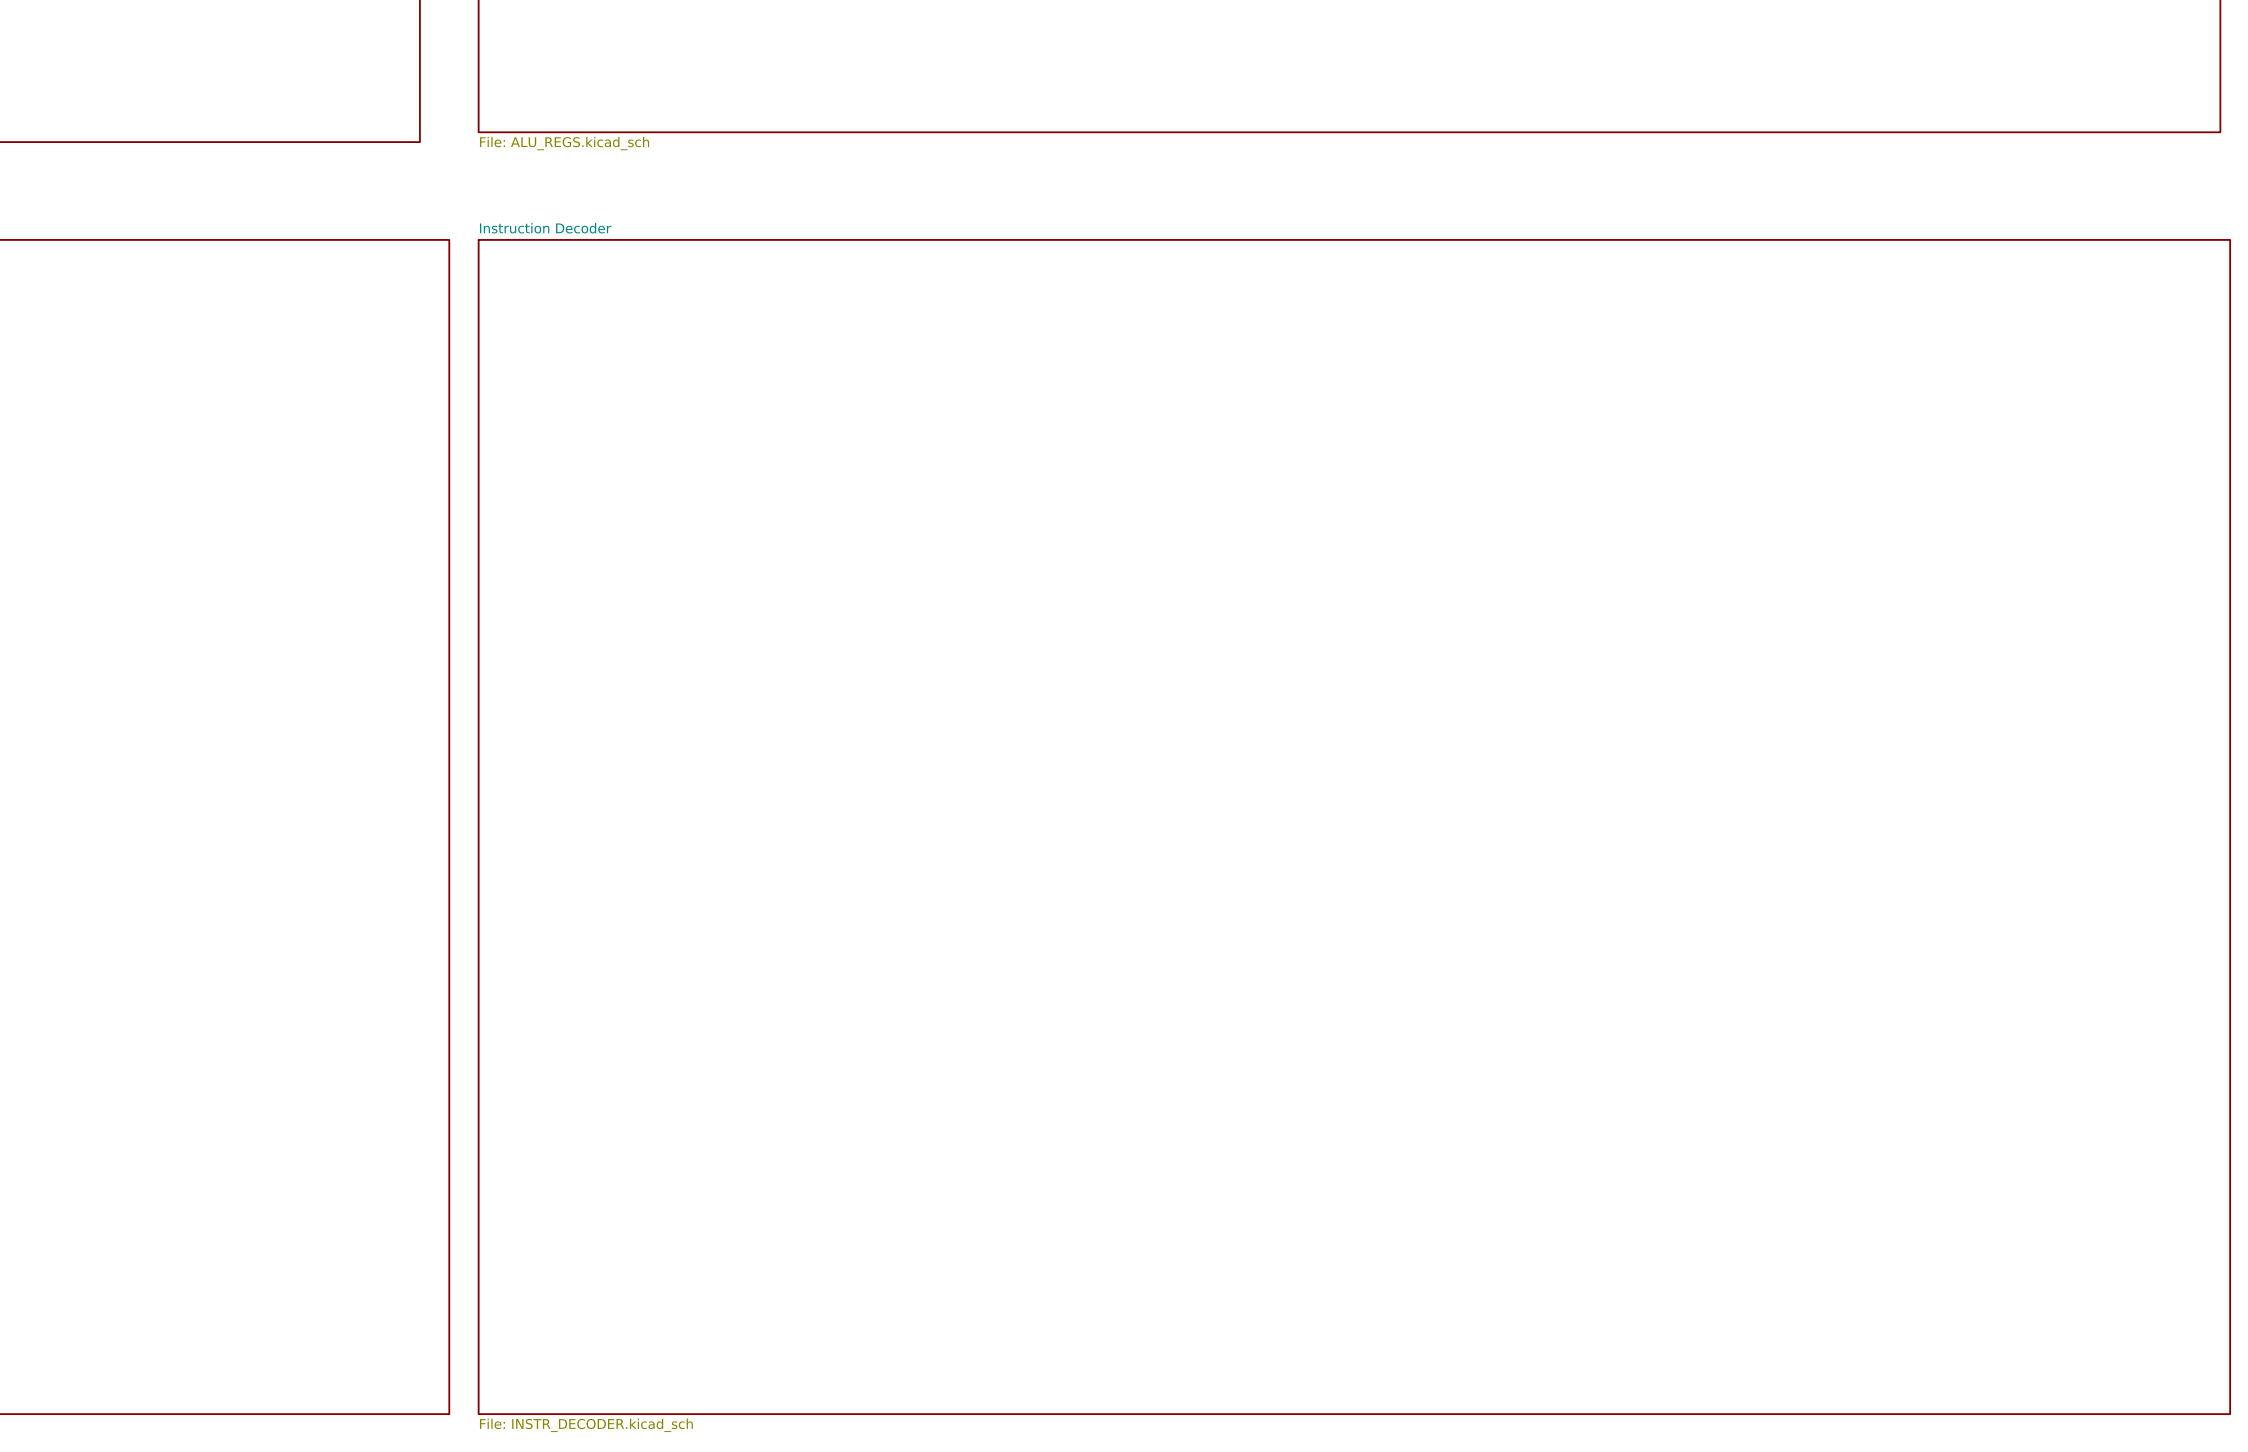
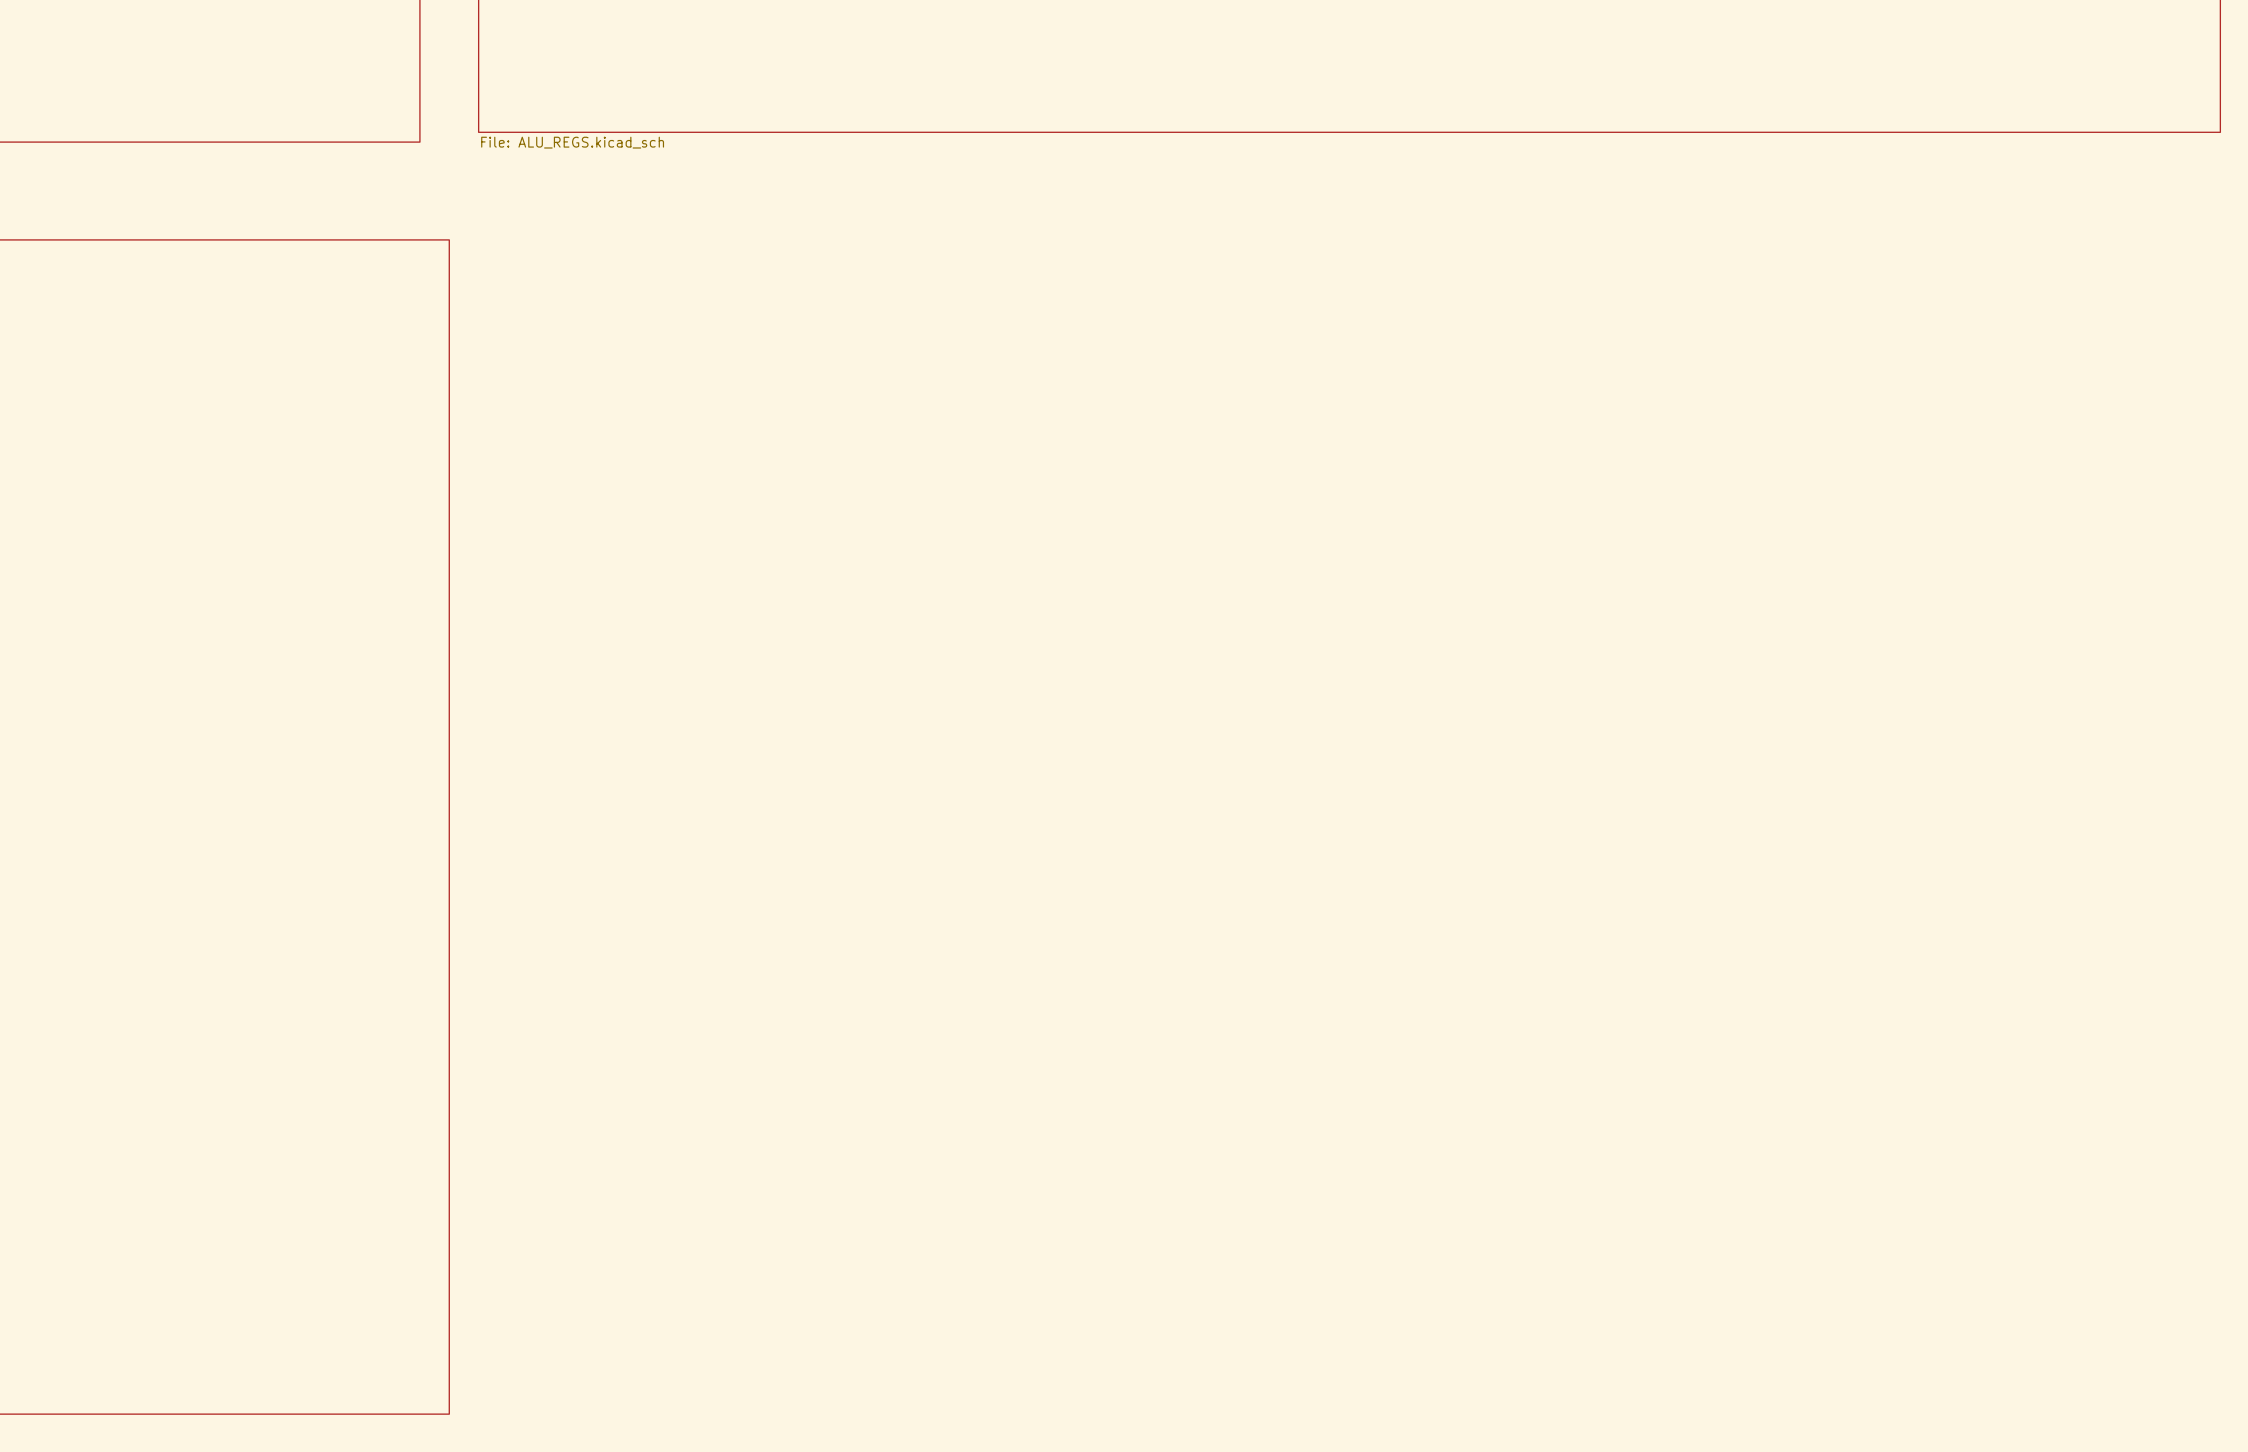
sheet Instruction Decoder: File: INSTR_DECODER.kicad_sch (1354, 827) -> none

